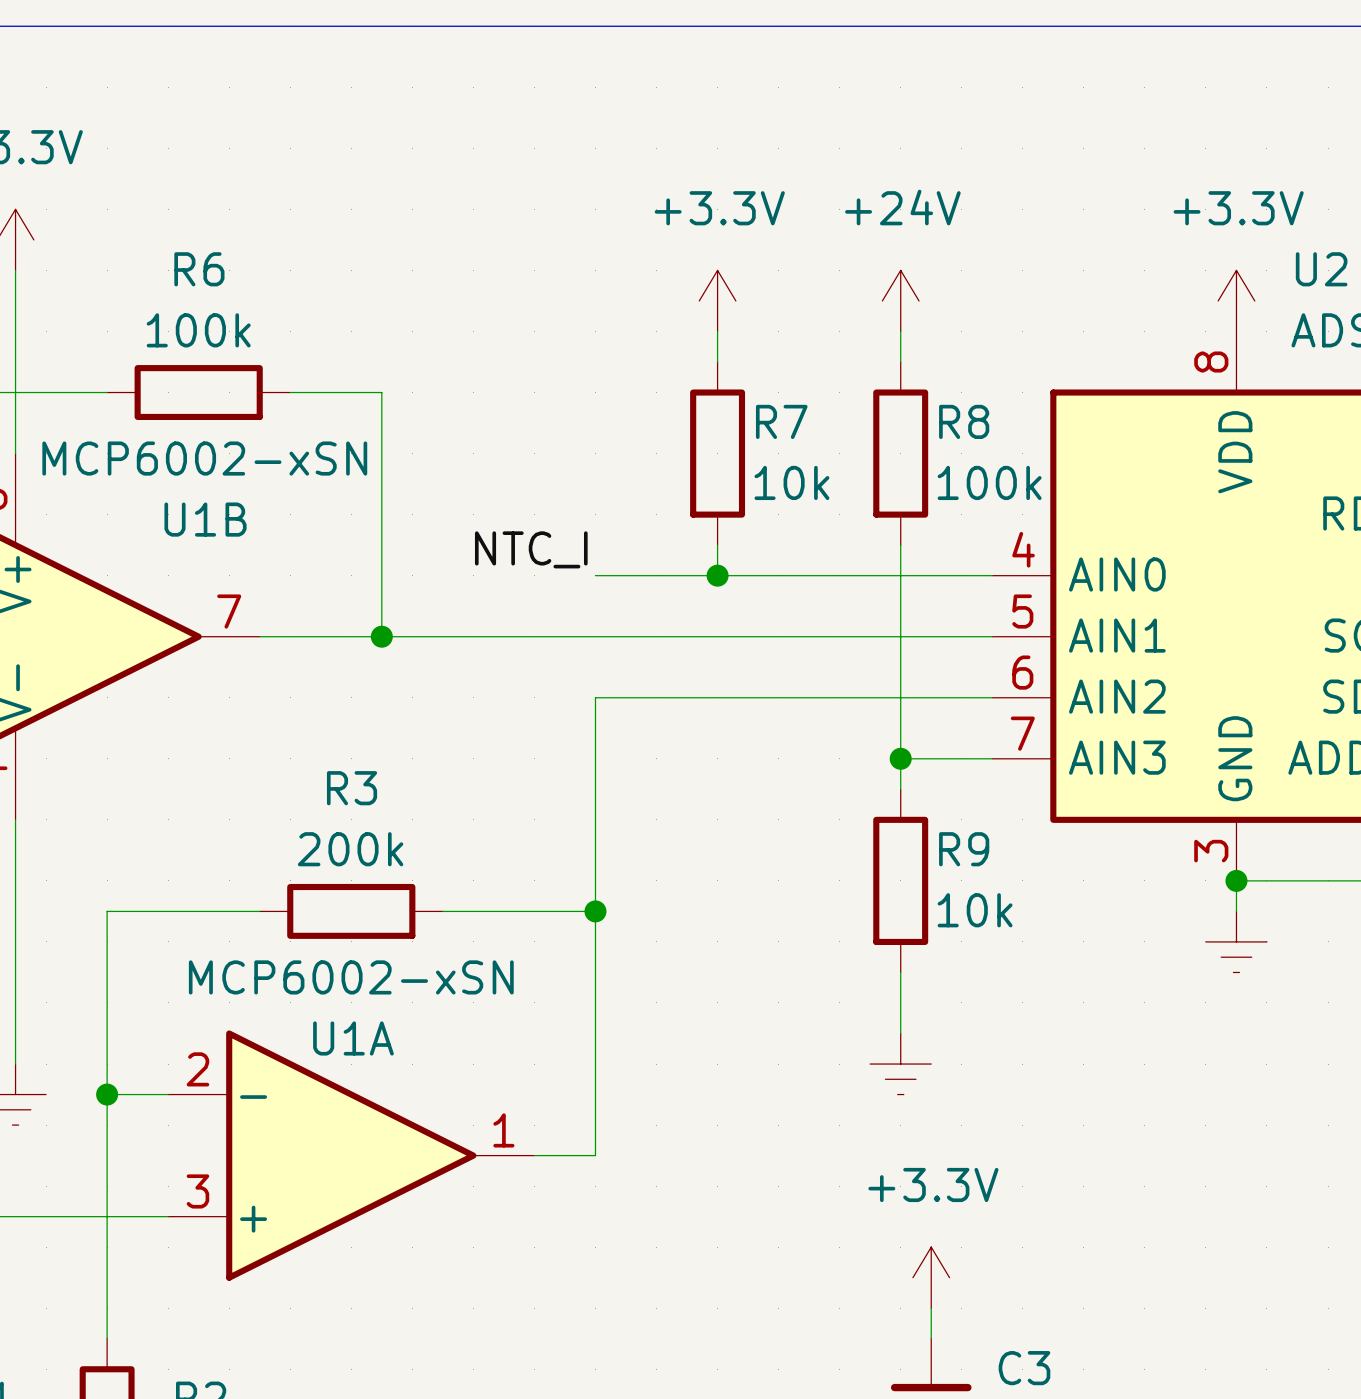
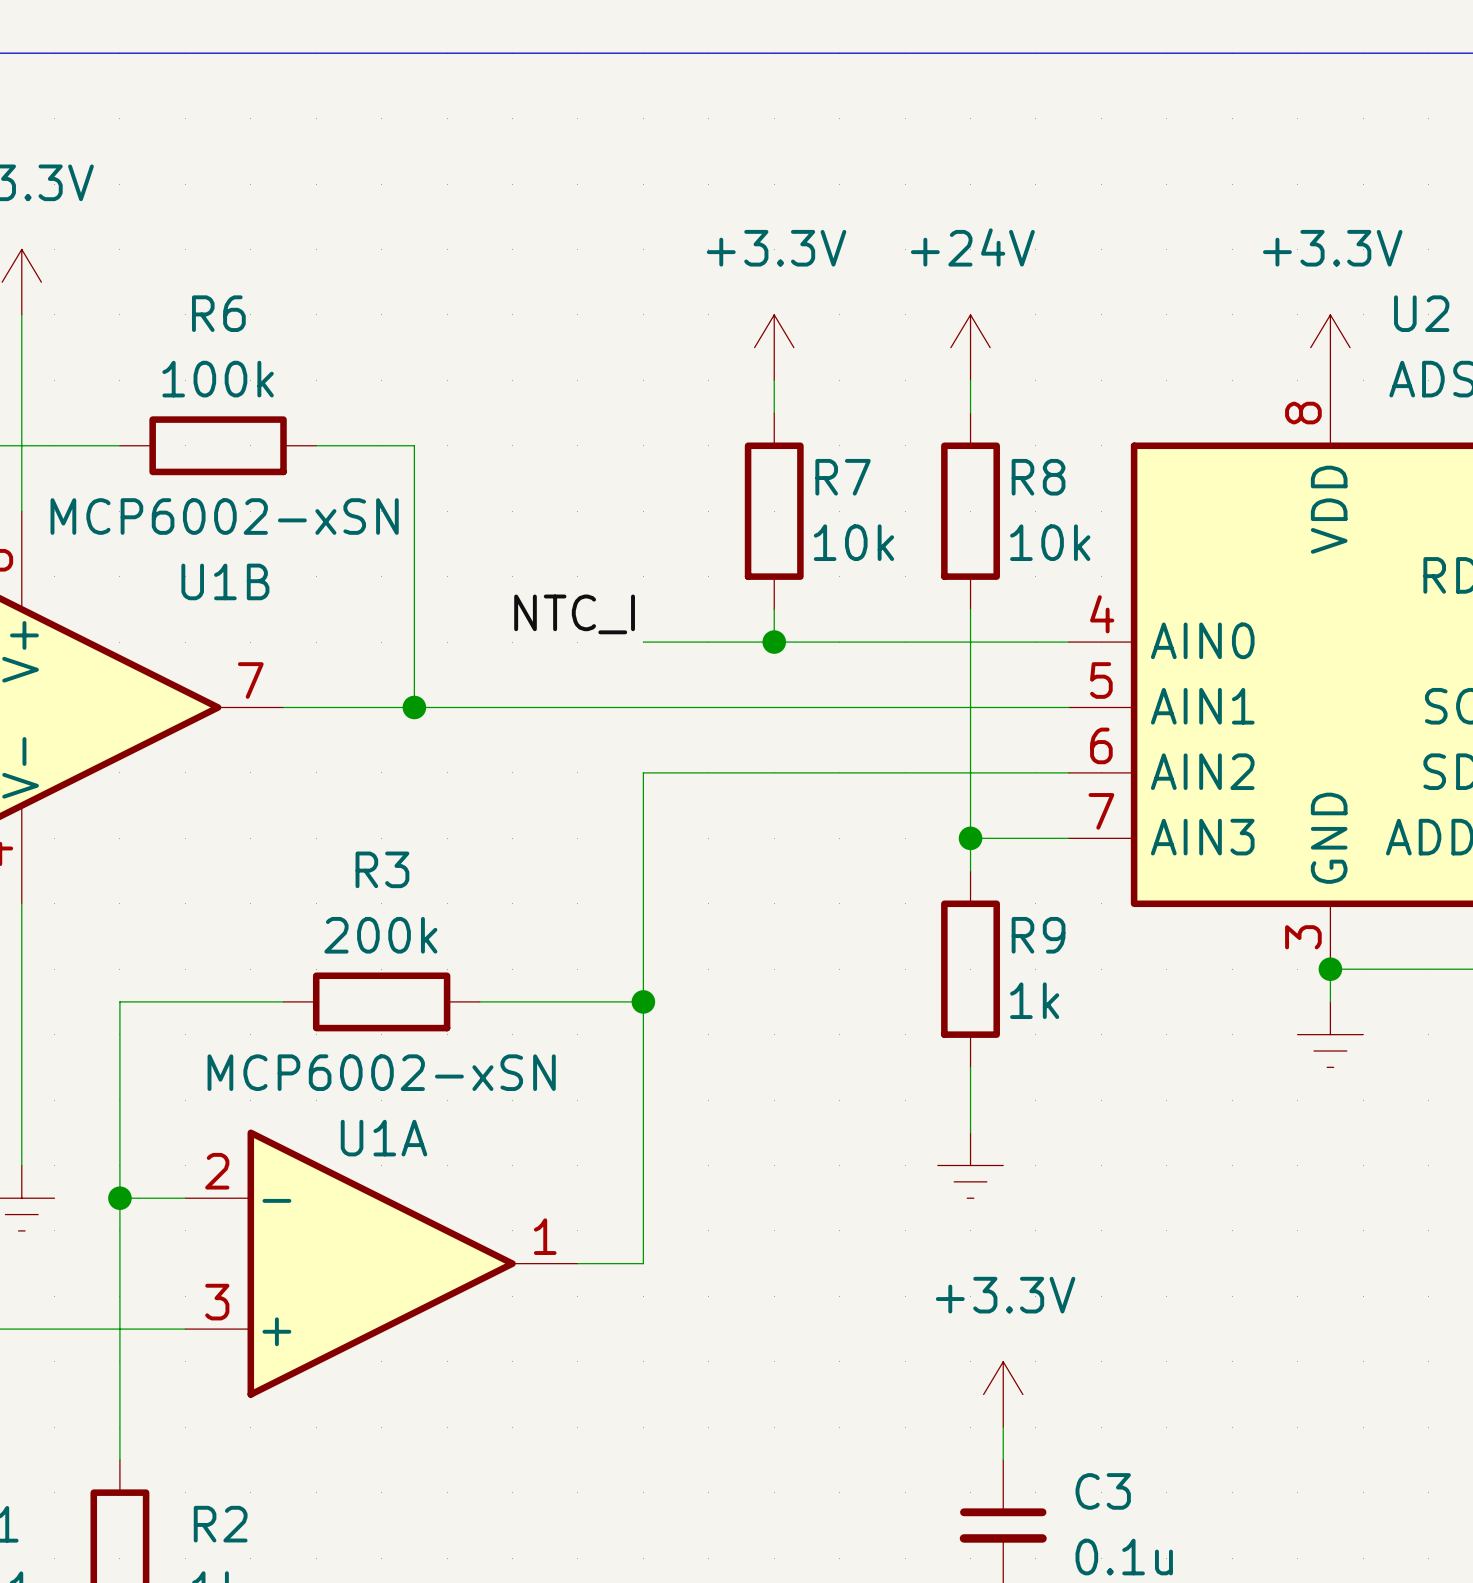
R8 value: 100k (989, 482) -> 10k (1050, 542)
R9 value: 10k (975, 910) -> 1k (1034, 1000)

